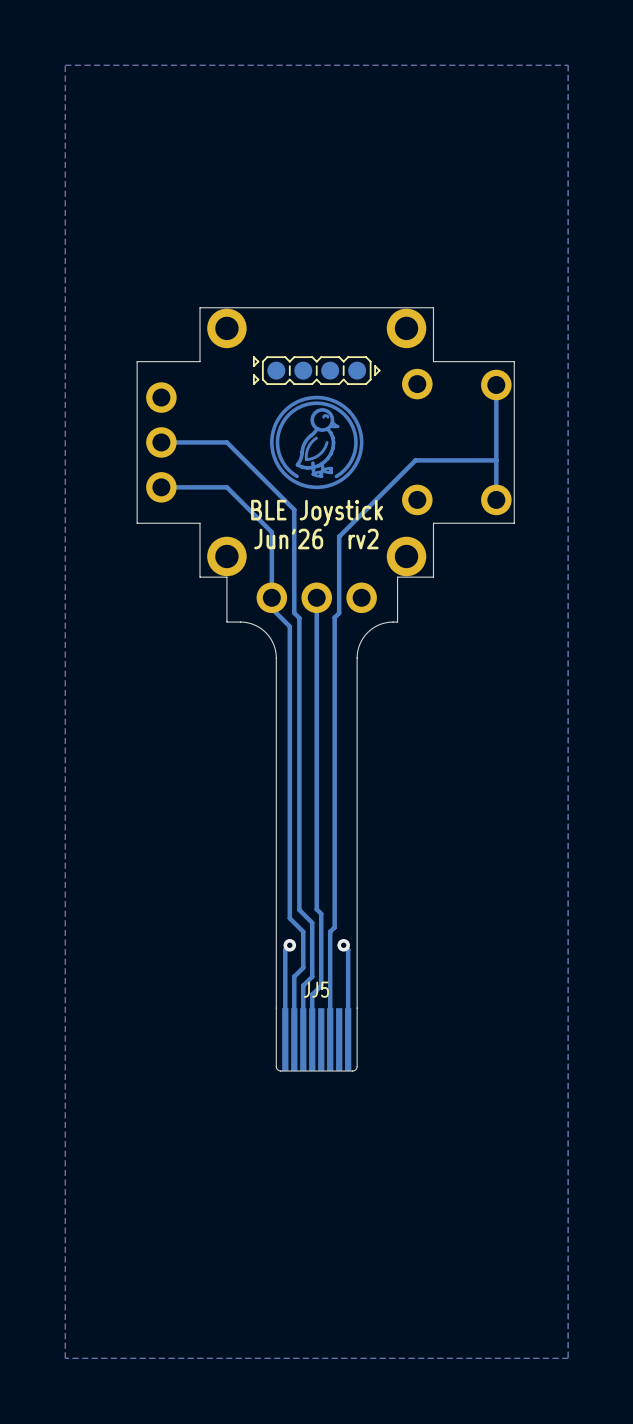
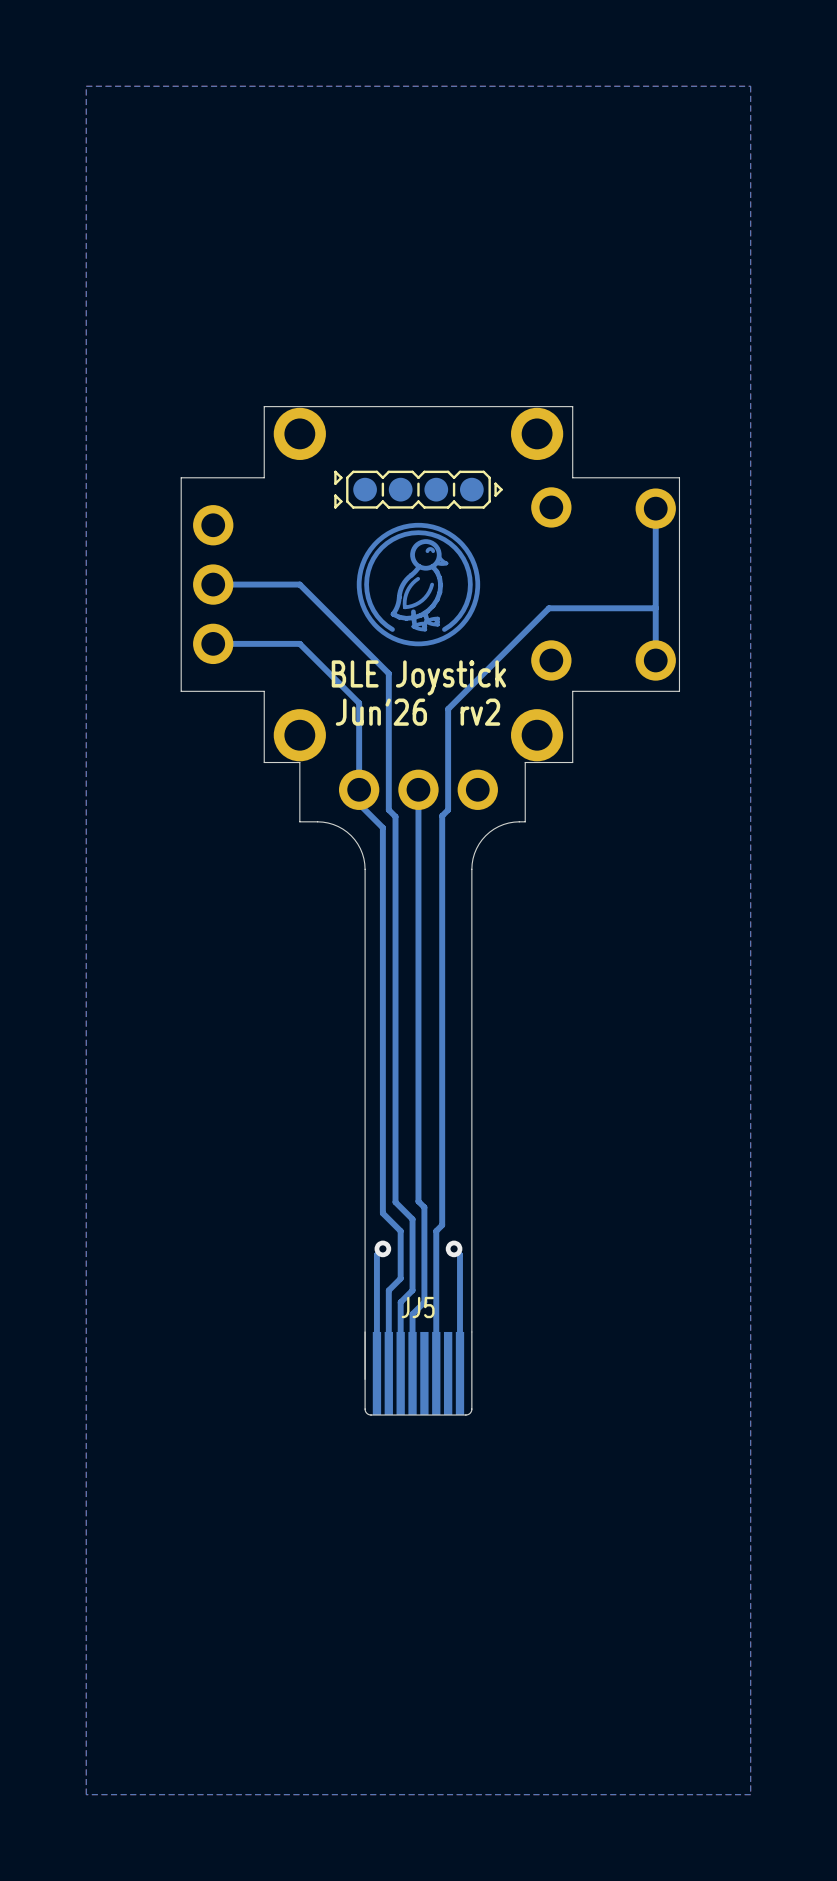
board edge: none -> (365, 1331) (365, 1379)

